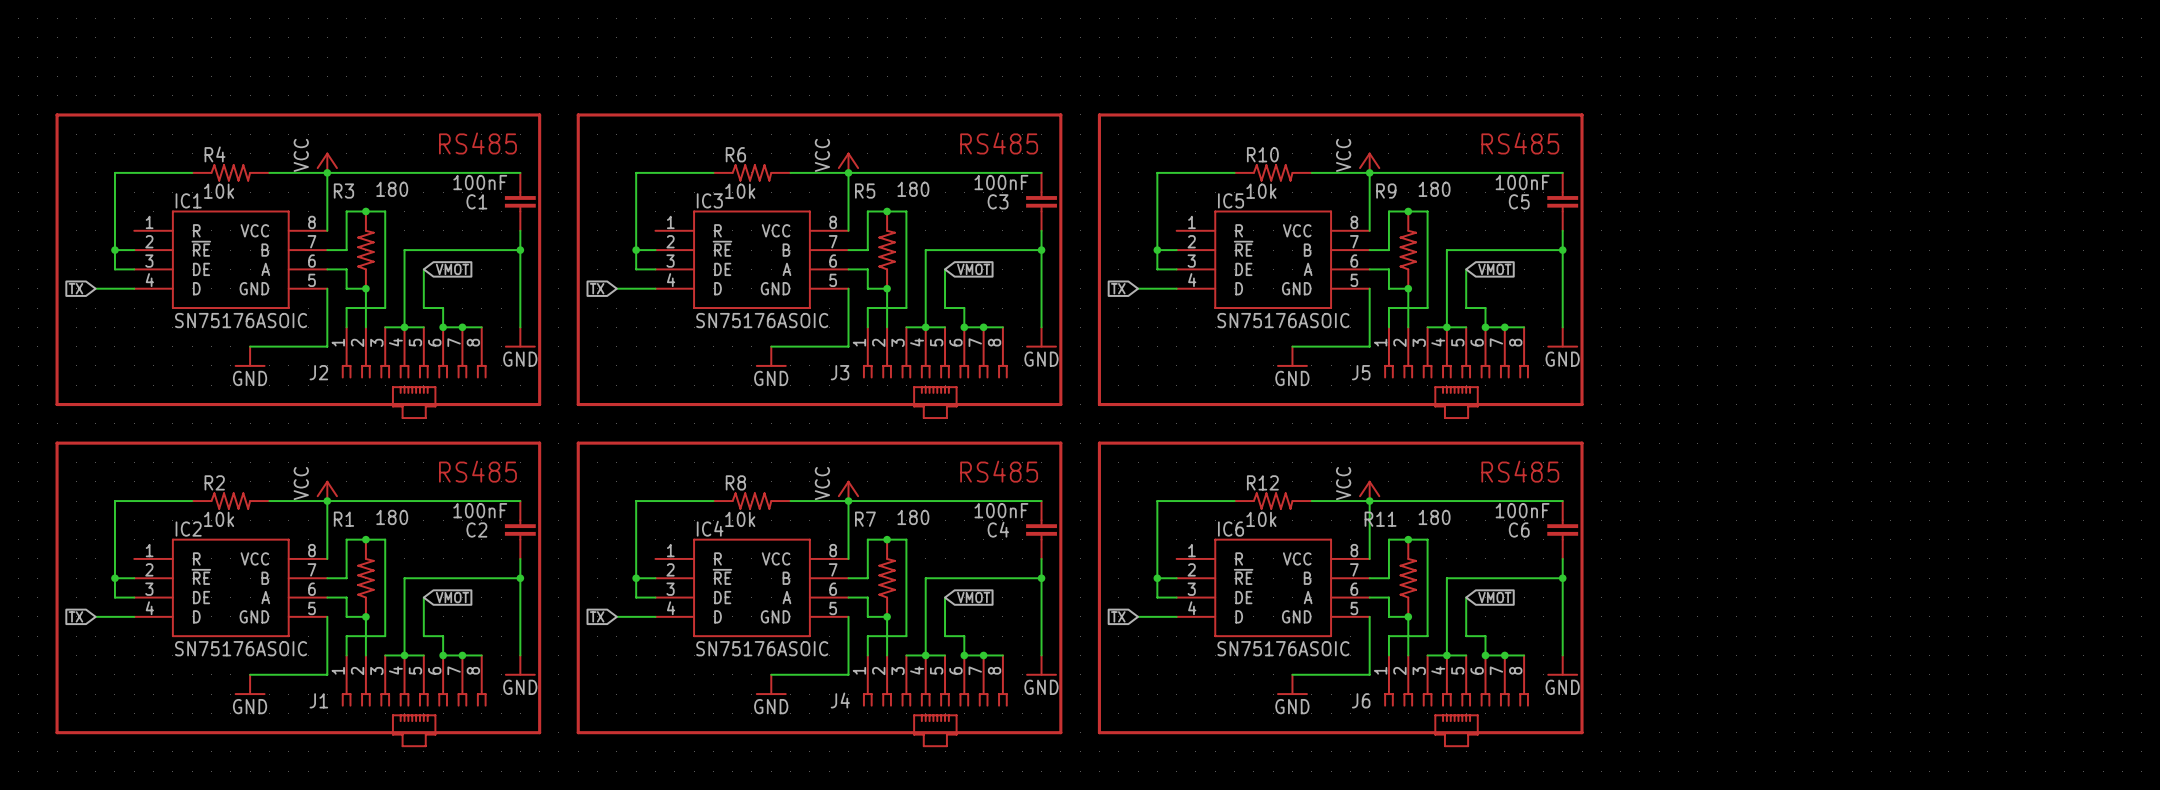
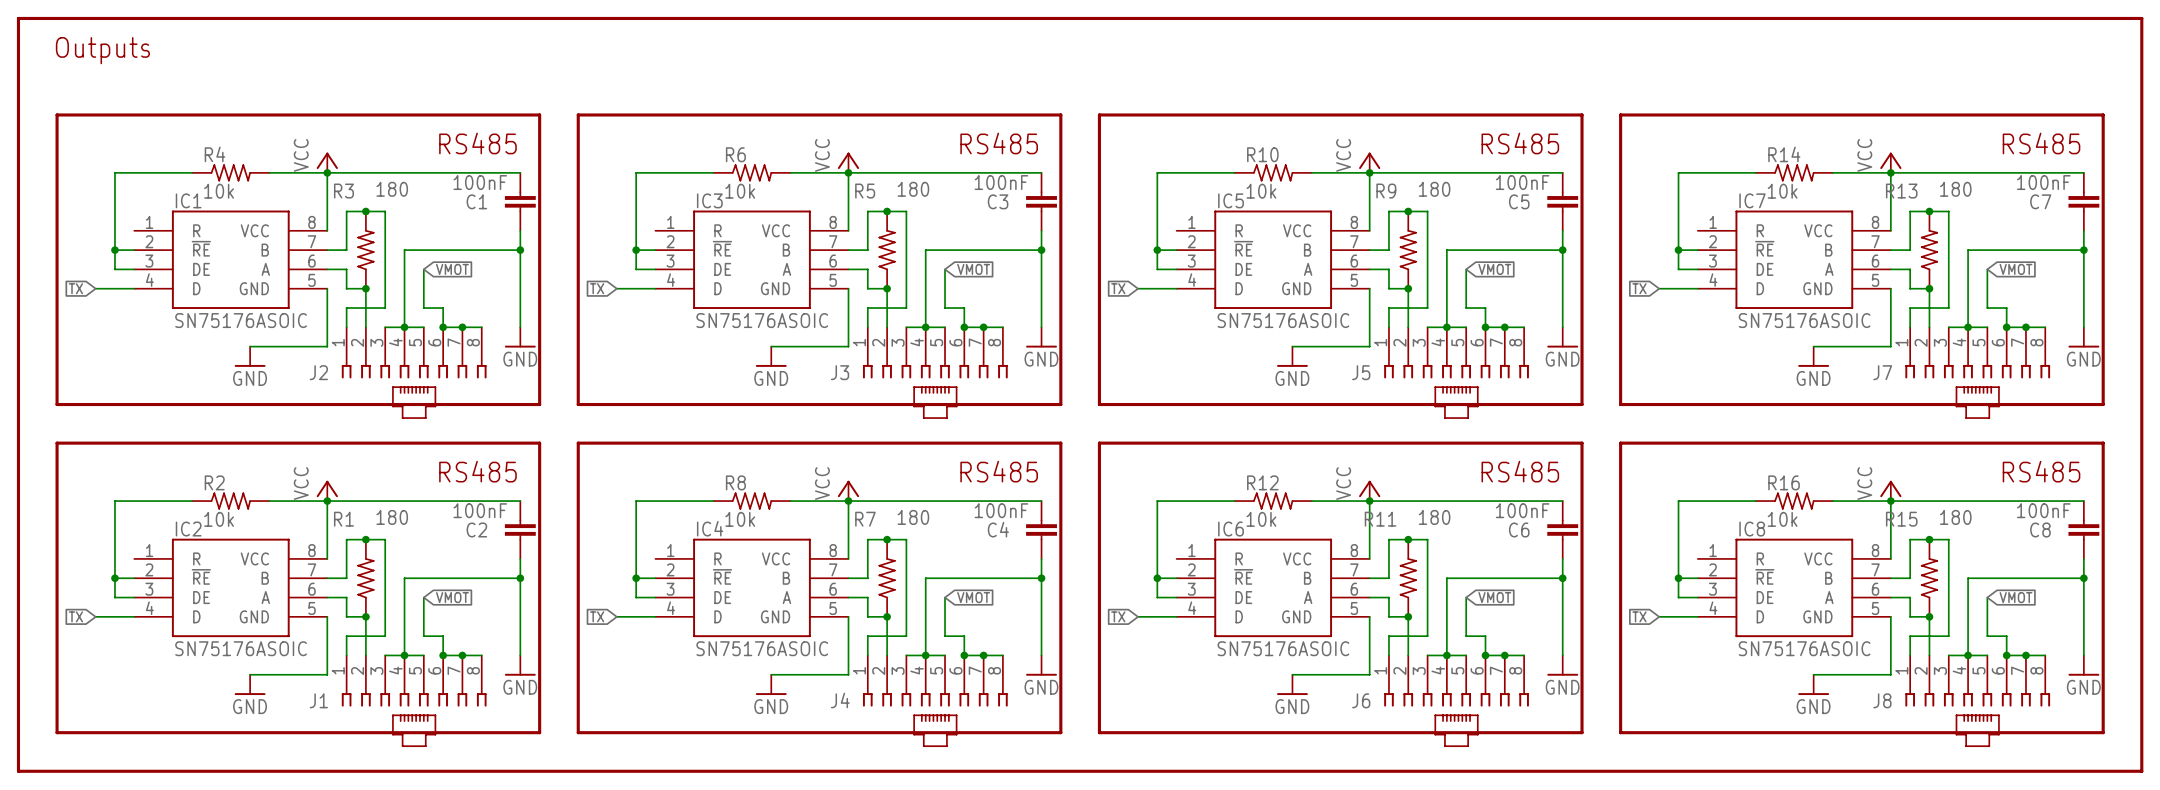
line: none -> (18, 18) (18, 771) (2141, 771) (2141, 18) (18, 18)
text: none -> Outputs (102, 50)
line: none -> (1620, 114) (2103, 114) (2103, 404) (1620, 404) (1620, 114)
text: none -> RS485 (2041, 143)
power symbol: none -> VCC (1890, 162)
wire: none -> (1755, 172) (1678, 172) (1678, 269) (1697, 269)
R14: none -> 10k (1794, 172)
wire: none -> (1832, 172) (2083, 172)
wire: none -> (1890, 172) (1890, 230)
junction: none -> (1890, 172)
C7: none -> 100nF (2083, 201)
junction: none -> (1929, 211)
wire: none -> (2083, 230) (2083, 327)
wire: none -> (1678, 250) (1697, 250)
junction: none -> (1678, 250)
wire: none -> (1890, 250) (1910, 250) (1910, 211) (1948, 211) (1948, 308) (1910, 308) (1910, 327)
R13: none -> 180 (1929, 250)
wire: none -> (2083, 250) (1968, 250) (1968, 327)
junction: none -> (2083, 250)
IC7: none -> SN75176ASOIC (1794, 259)
wire: none -> (1890, 269) (1910, 269) (1910, 288) (1929, 288) (1929, 327)
wire: none -> (1987, 269) (1987, 308) (2006, 308) (2006, 327) (2045, 327)
global label: none -> VMOT (2016, 269)
global label: none -> TX (1639, 288)
wire: none -> (1659, 288) (1697, 288)
wire: none -> (1890, 288) (1890, 346) (1813, 346)
junction: none -> (1929, 288)
wire: none -> (1948, 327) (1987, 327)
junction: none -> (1968, 327)
junction: none -> (2006, 327)
junction: none -> (2025, 327)
power symbol: none -> GND (2083, 337)
power symbol: none -> GND (1813, 356)
J7: none -> (1977, 373)
line: none -> (1620, 443) (2103, 443) (2103, 732) (1620, 732) (1620, 443)
text: none -> RS485 (2041, 471)
power symbol: none -> VCC (1890, 490)
wire: none -> (1755, 501) (1678, 501) (1678, 597) (1697, 597)
R16: none -> 10k (1794, 501)
wire: none -> (1832, 501) (2083, 501)
wire: none -> (1890, 501) (1890, 558)
junction: none -> (1890, 501)
C8: none -> 100nF (2083, 529)
junction: none -> (1929, 539)
wire: none -> (2083, 558) (2083, 655)
wire: none -> (1678, 578) (1697, 578)
junction: none -> (1678, 578)
wire: none -> (1890, 578) (1910, 578) (1910, 539) (1948, 539) (1948, 636) (1910, 636) (1910, 655)
R15: none -> 180 (1929, 578)
wire: none -> (2083, 578) (1968, 578) (1968, 655)
junction: none -> (2083, 578)
IC8: none -> SN75176ASOIC (1794, 587)
wire: none -> (1890, 597) (1910, 597) (1910, 616) (1929, 616) (1929, 655)
wire: none -> (1987, 597) (1987, 636) (2006, 636) (2006, 655) (2045, 655)
global label: none -> VMOT (2016, 597)
global label: none -> TX (1639, 616)
wire: none -> (1659, 616) (1697, 616)
wire: none -> (1890, 616) (1890, 674) (1813, 674)
junction: none -> (1929, 616)
wire: none -> (1948, 655) (1987, 655)
junction: none -> (1968, 655)
junction: none -> (2006, 655)
junction: none -> (2025, 655)
power symbol: none -> GND (2083, 665)
power symbol: none -> GND (1813, 684)
J8: none -> (1977, 701)

